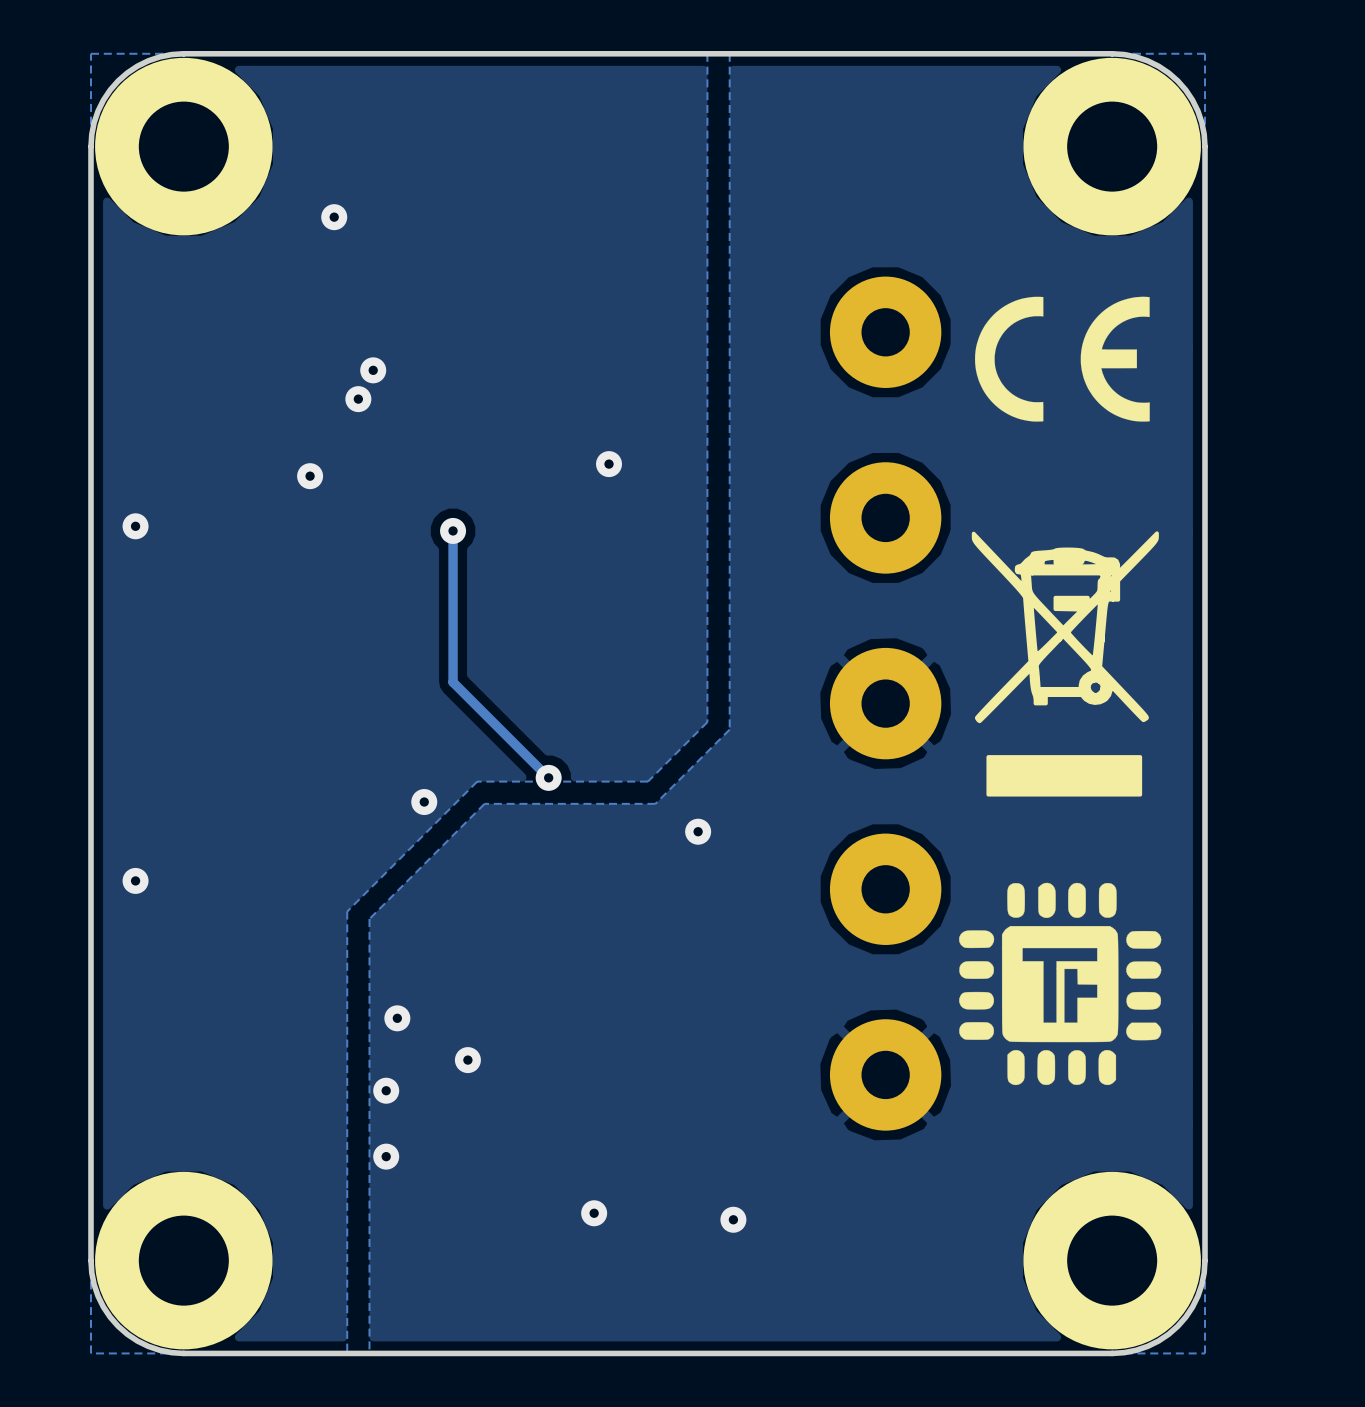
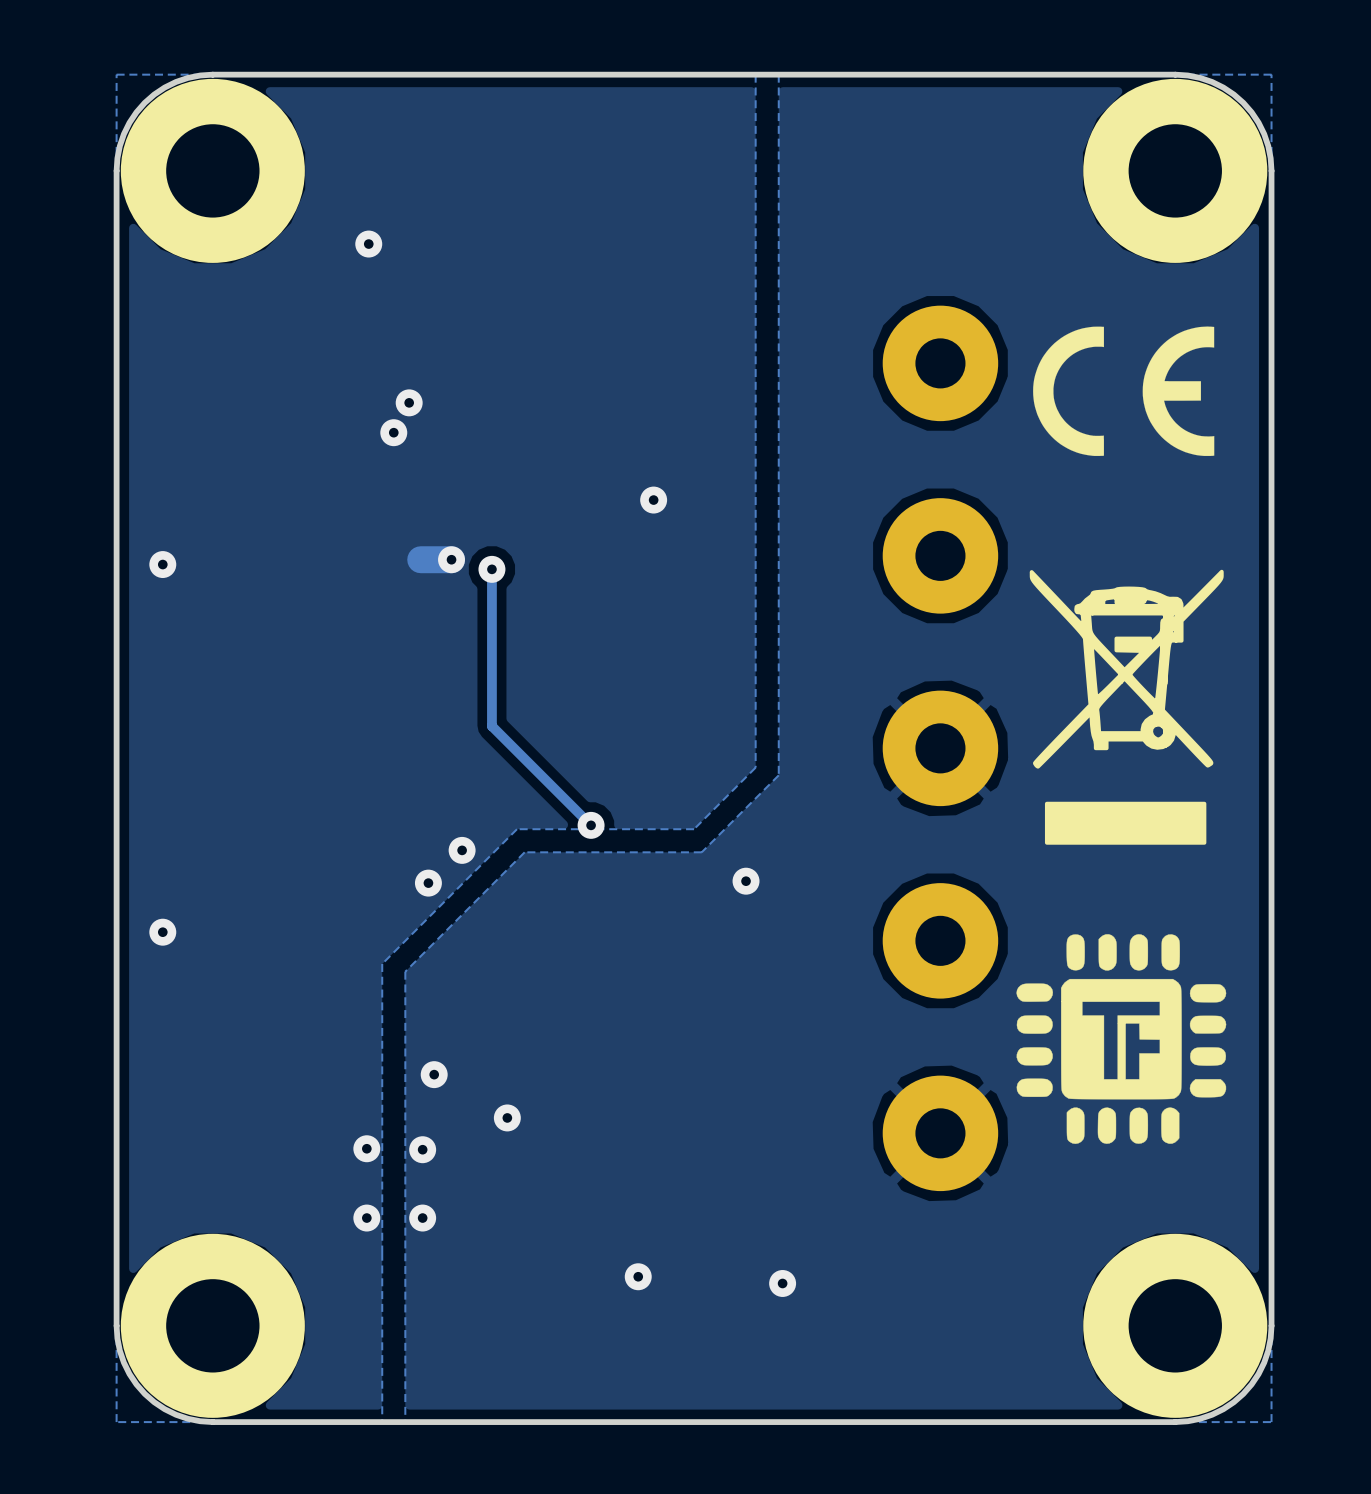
via position: (310, 476) -> (451, 559)
track: none -> (451, 559) (420, 559)
via: none -> (428, 883)
via: none -> (366, 1148)
via: none -> (366, 1218)

